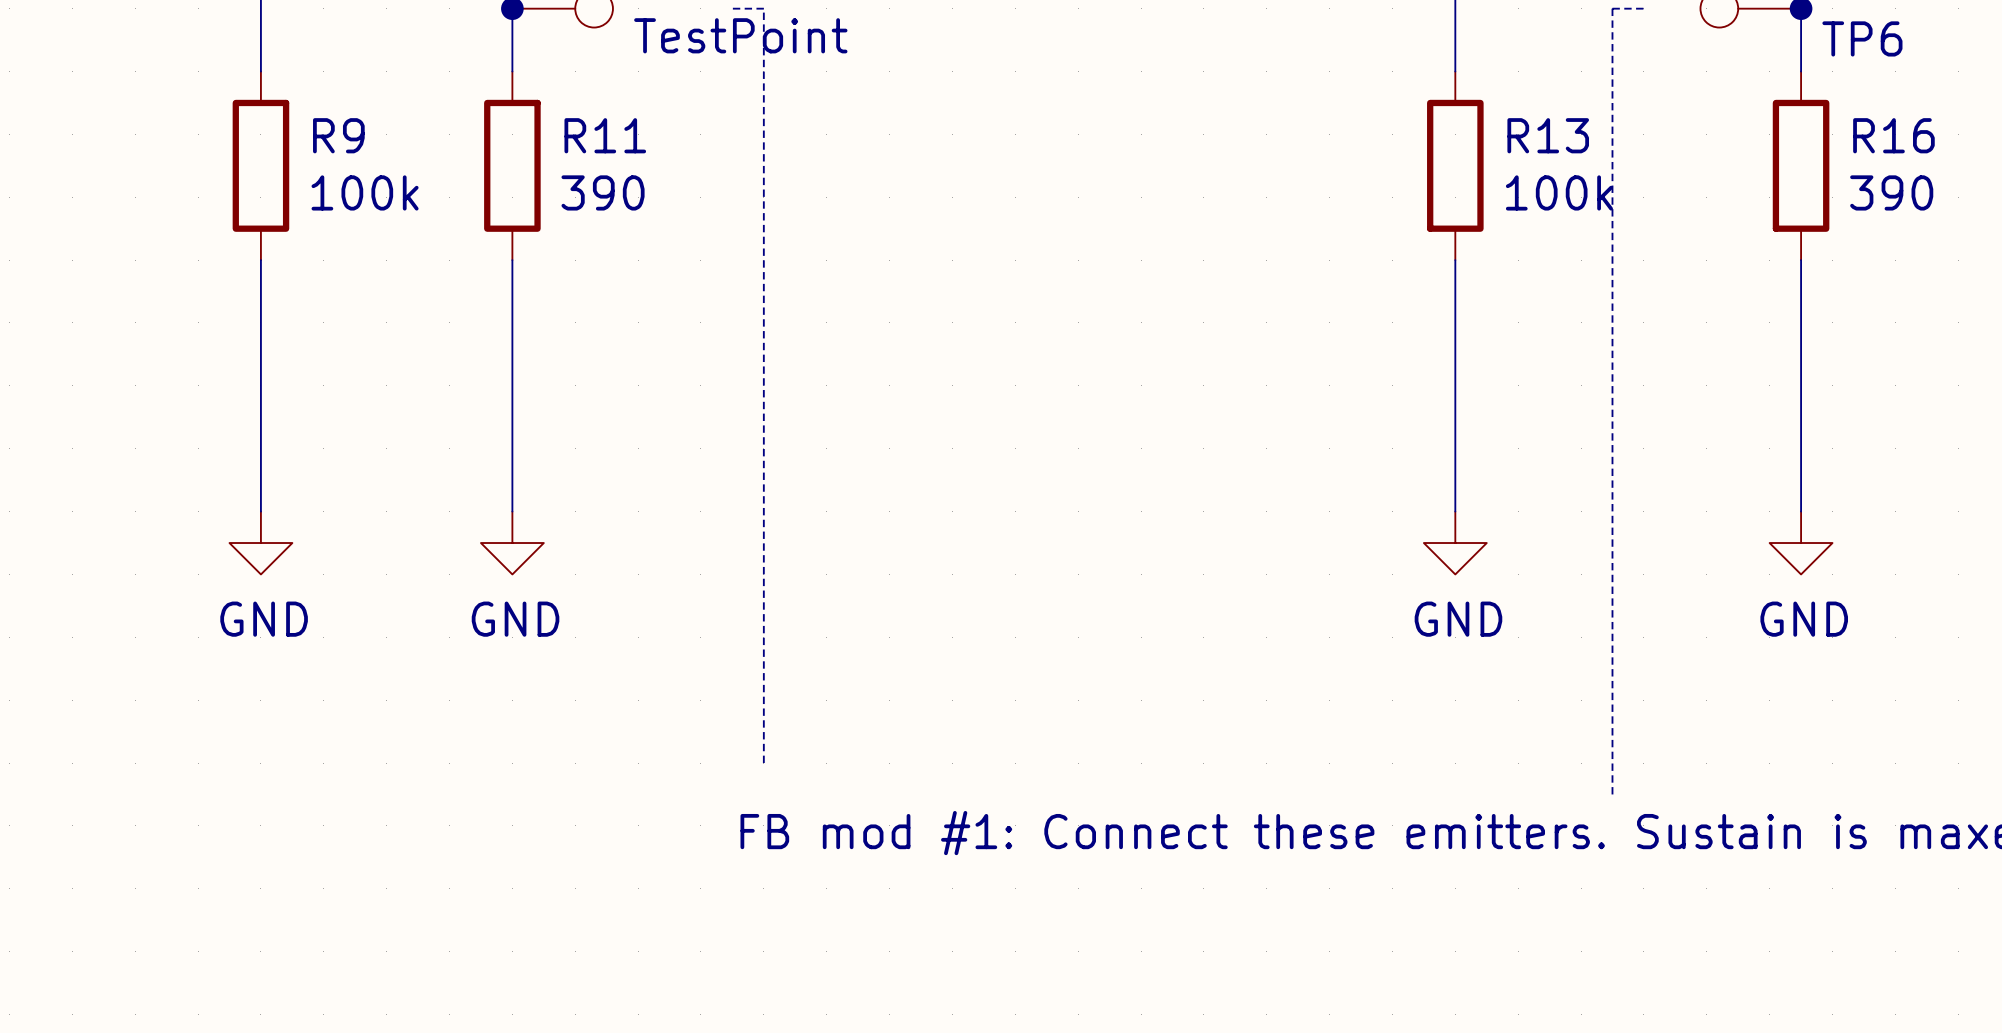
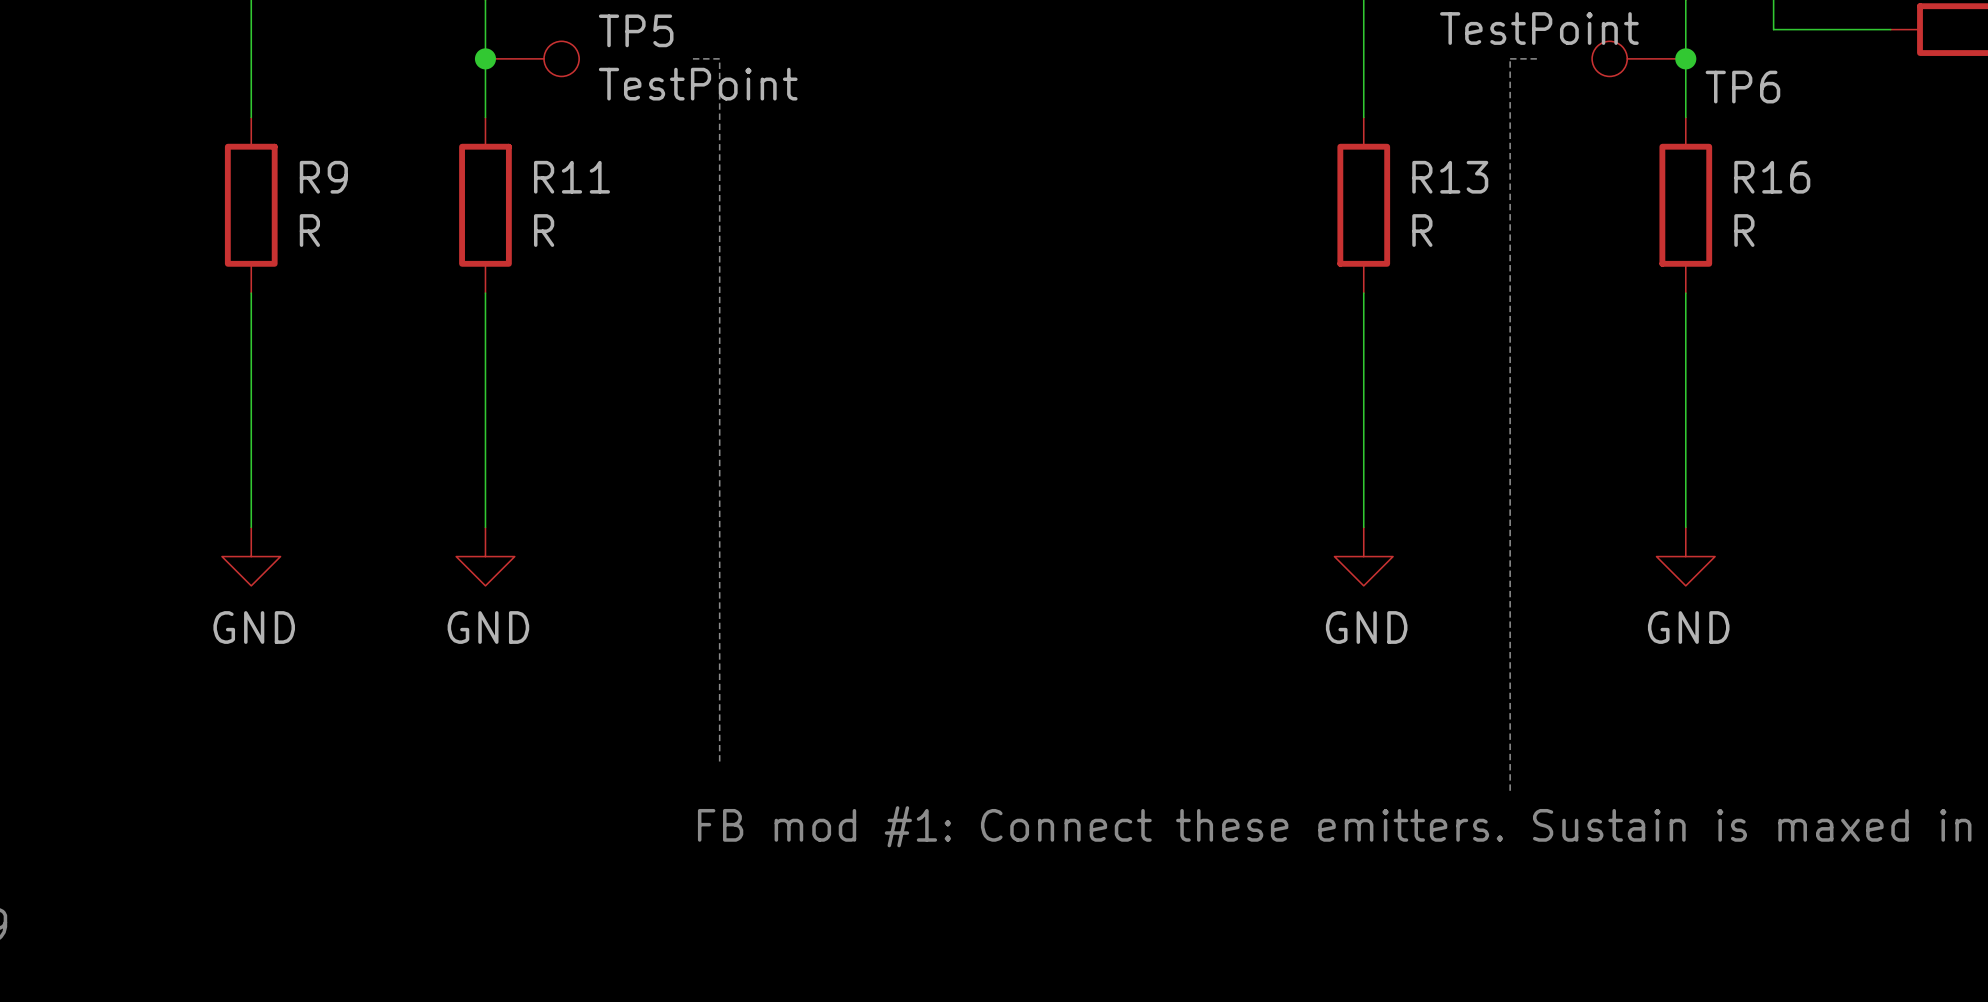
R9 value: 100k (365, 192) -> R (309, 230)
R11 value: 390 (603, 192) -> R (544, 230)
R13 value: 100k (1559, 192) -> R (1422, 230)
R16 value: 390 (1891, 192) -> R (1744, 230)

